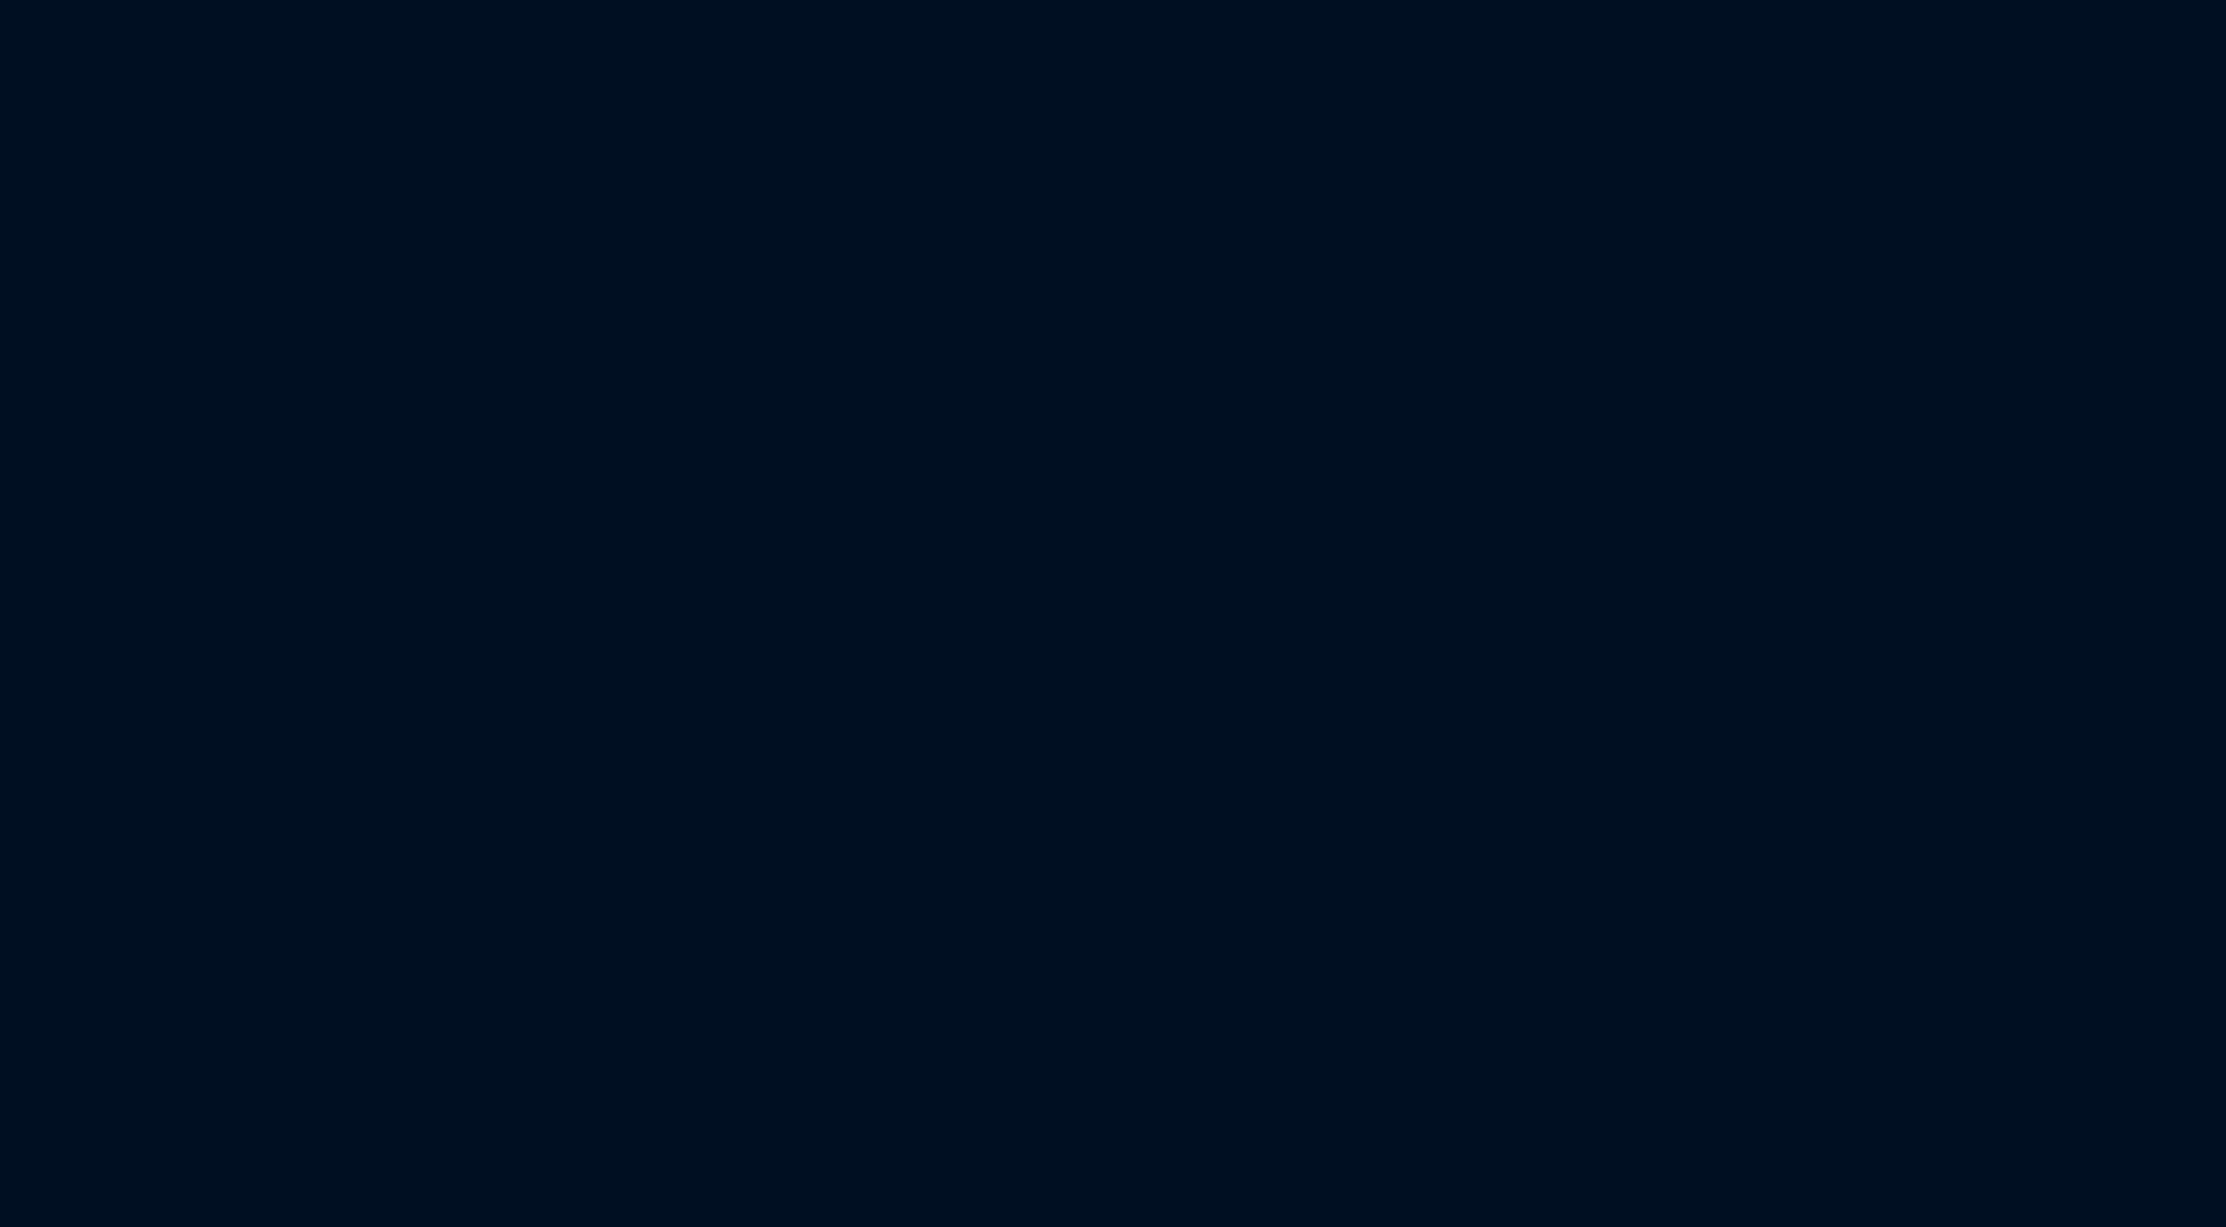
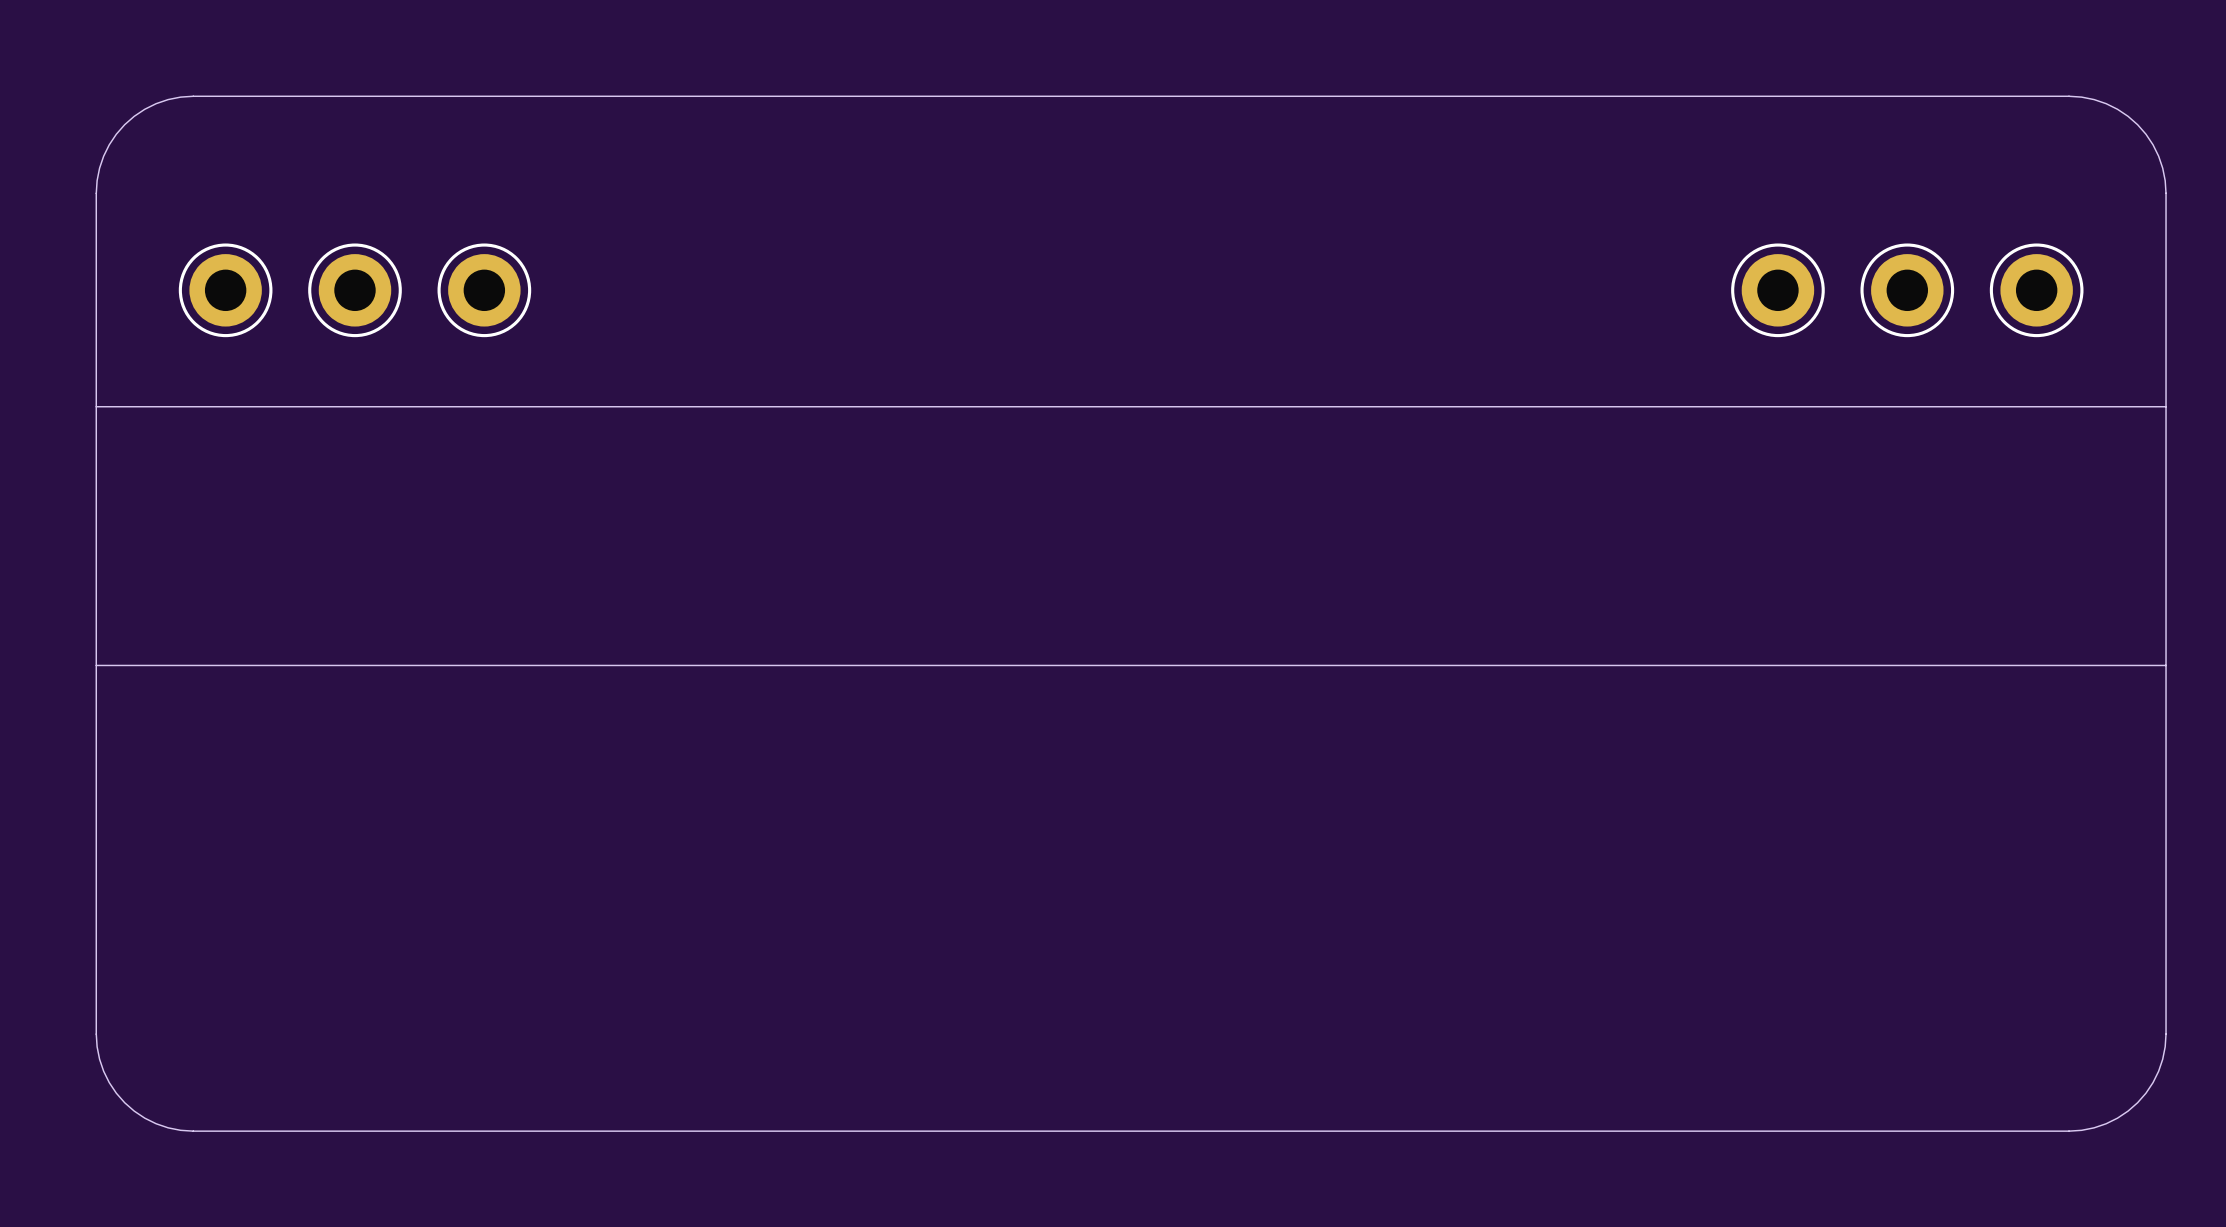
board edge: none -> (193, 96) (2069, 96) (2094, 99) (2117, 109) (2137, 124) (2153, 144) (2162, 168) (2166, 193) (2166, 1034) (2162, 1059) (2153, 1082) (2137, 1102) (2117, 1118) (2094, 1127) (2069, 1131) (193, 1131) (168, 1127) (144, 1118) (124, 1102) (109, 1082) (99, 1059) (96, 1034) (96, 193) (97, 180) (103, 156) (109, 144) (124, 124) (144, 109) (156, 103) (168, 99) (193, 96)
part: none -> (225, 290)
part: none -> (354, 290)
part: none -> (484, 290)
part: none -> (1777, 290)
part: none -> (1907, 290)
part: none -> (2036, 290)
board edge: none -> (96, 406) (2166, 406)
board edge: none -> (96, 665) (2166, 665)

